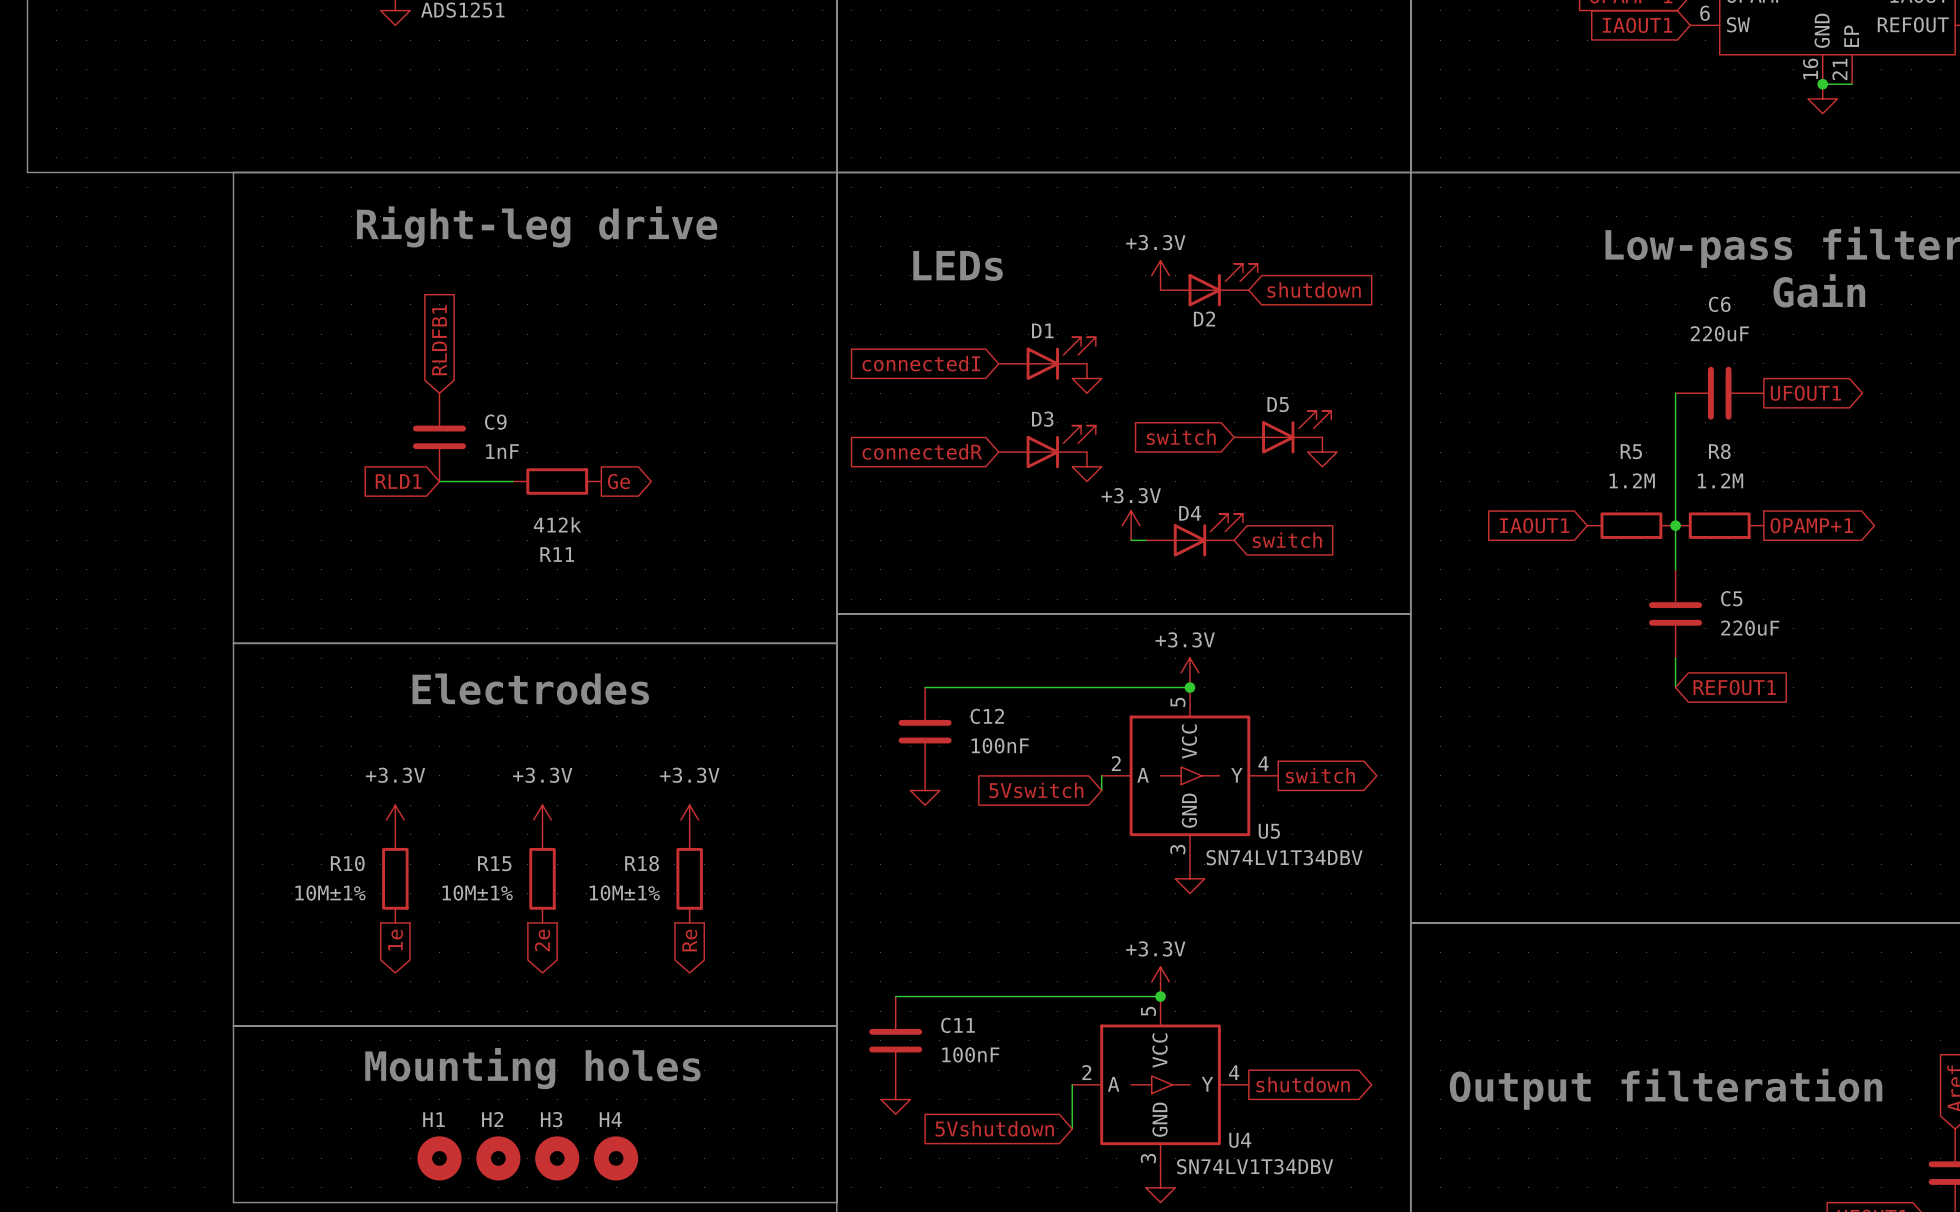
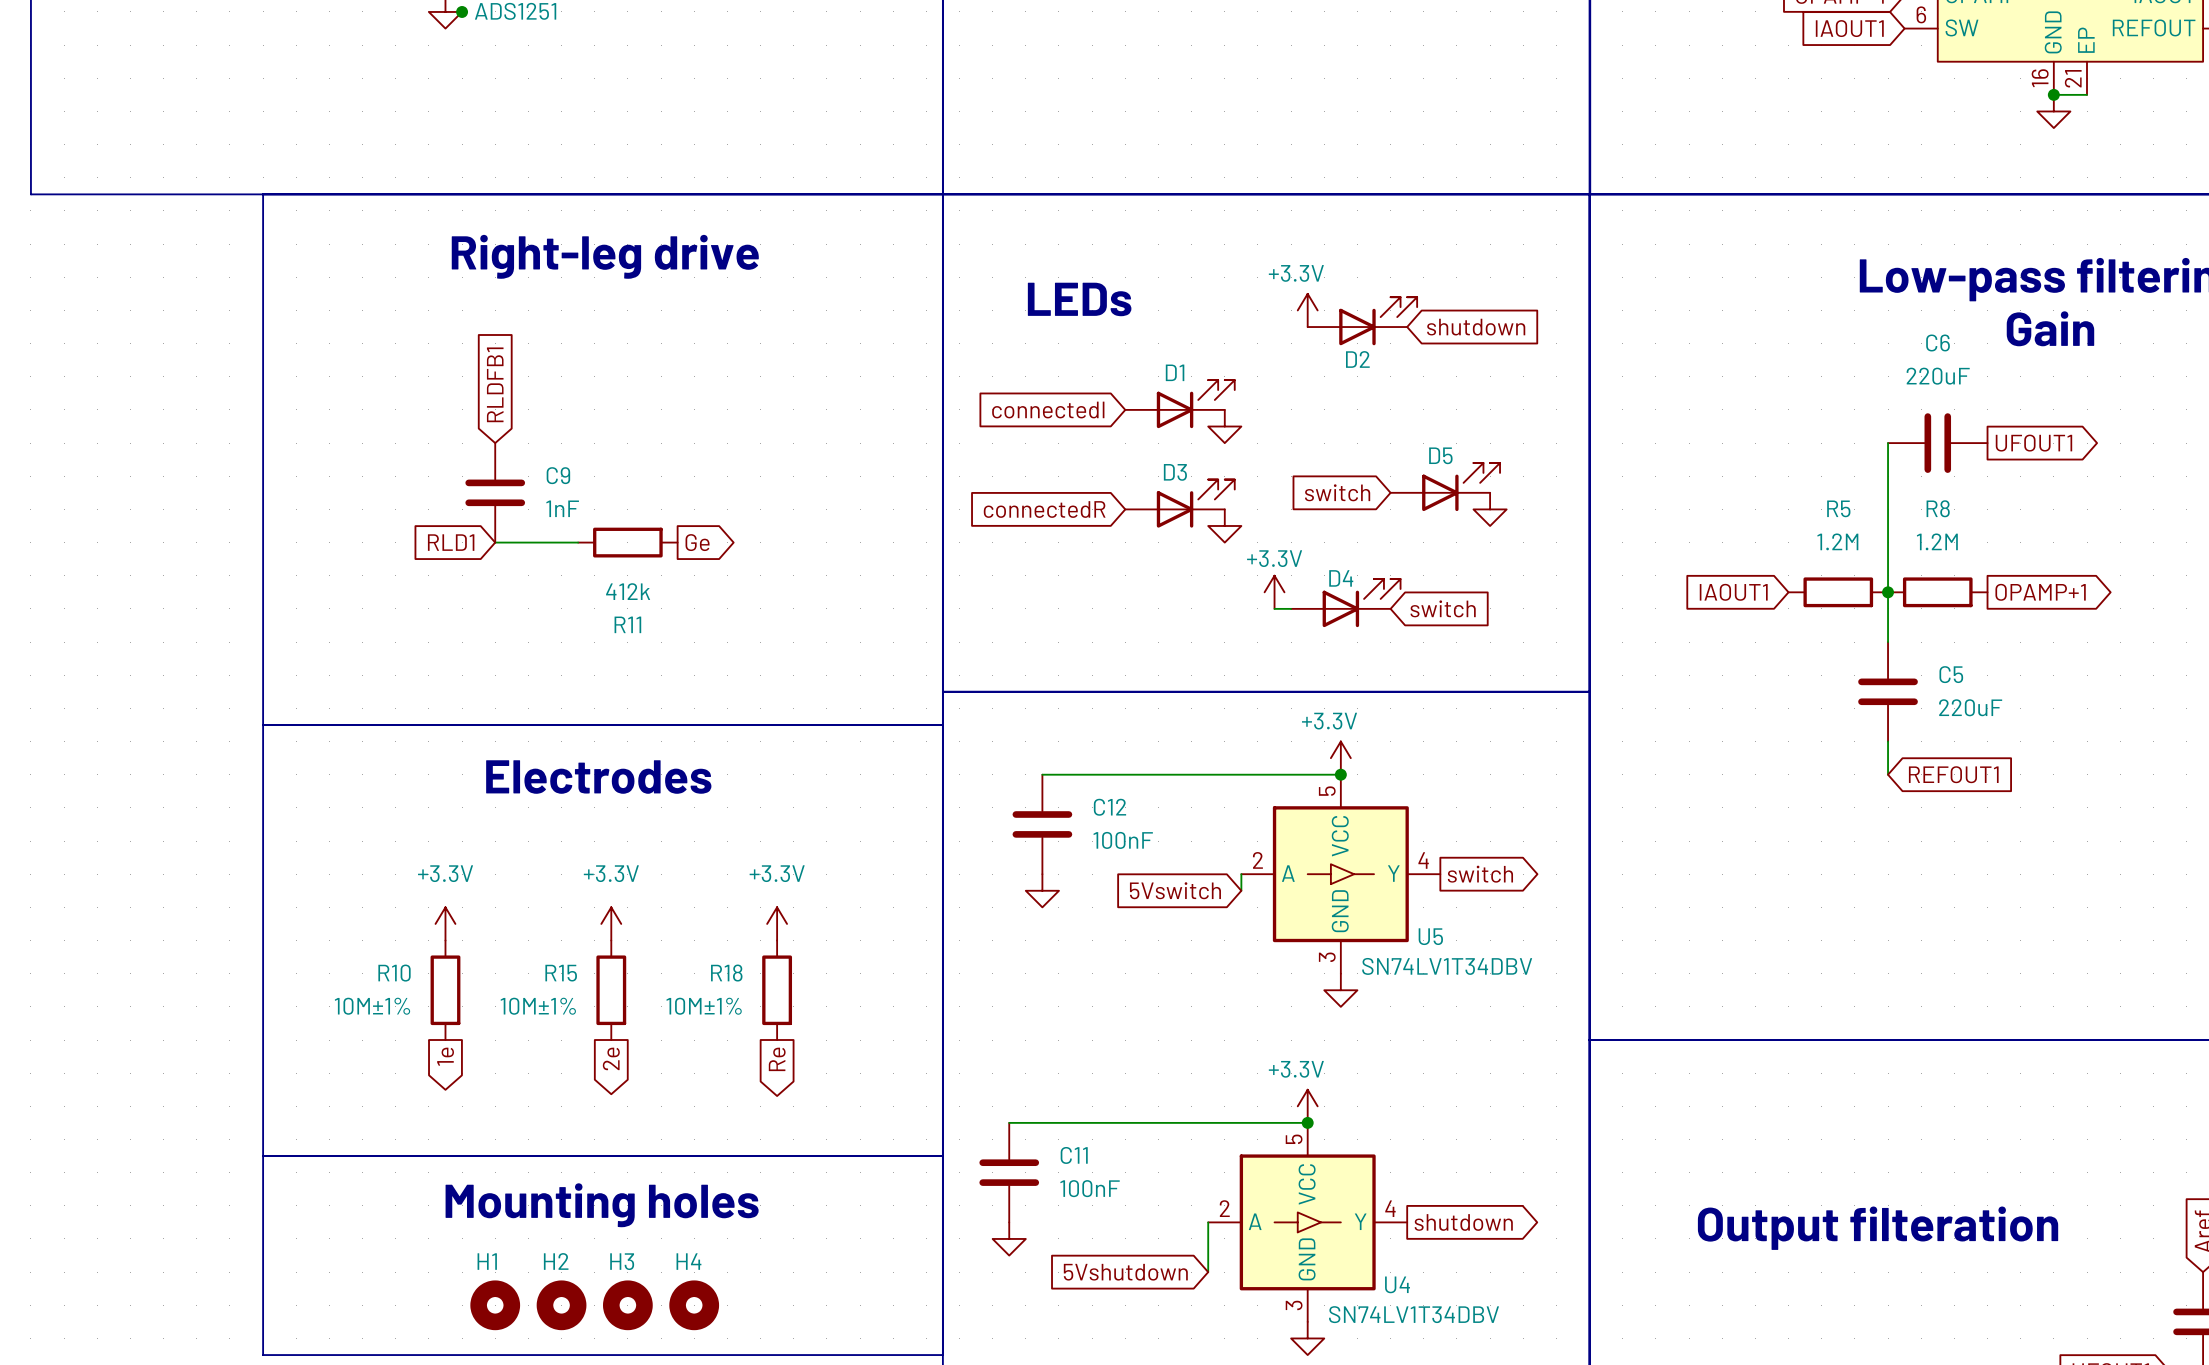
junction: none -> (462, 11)

